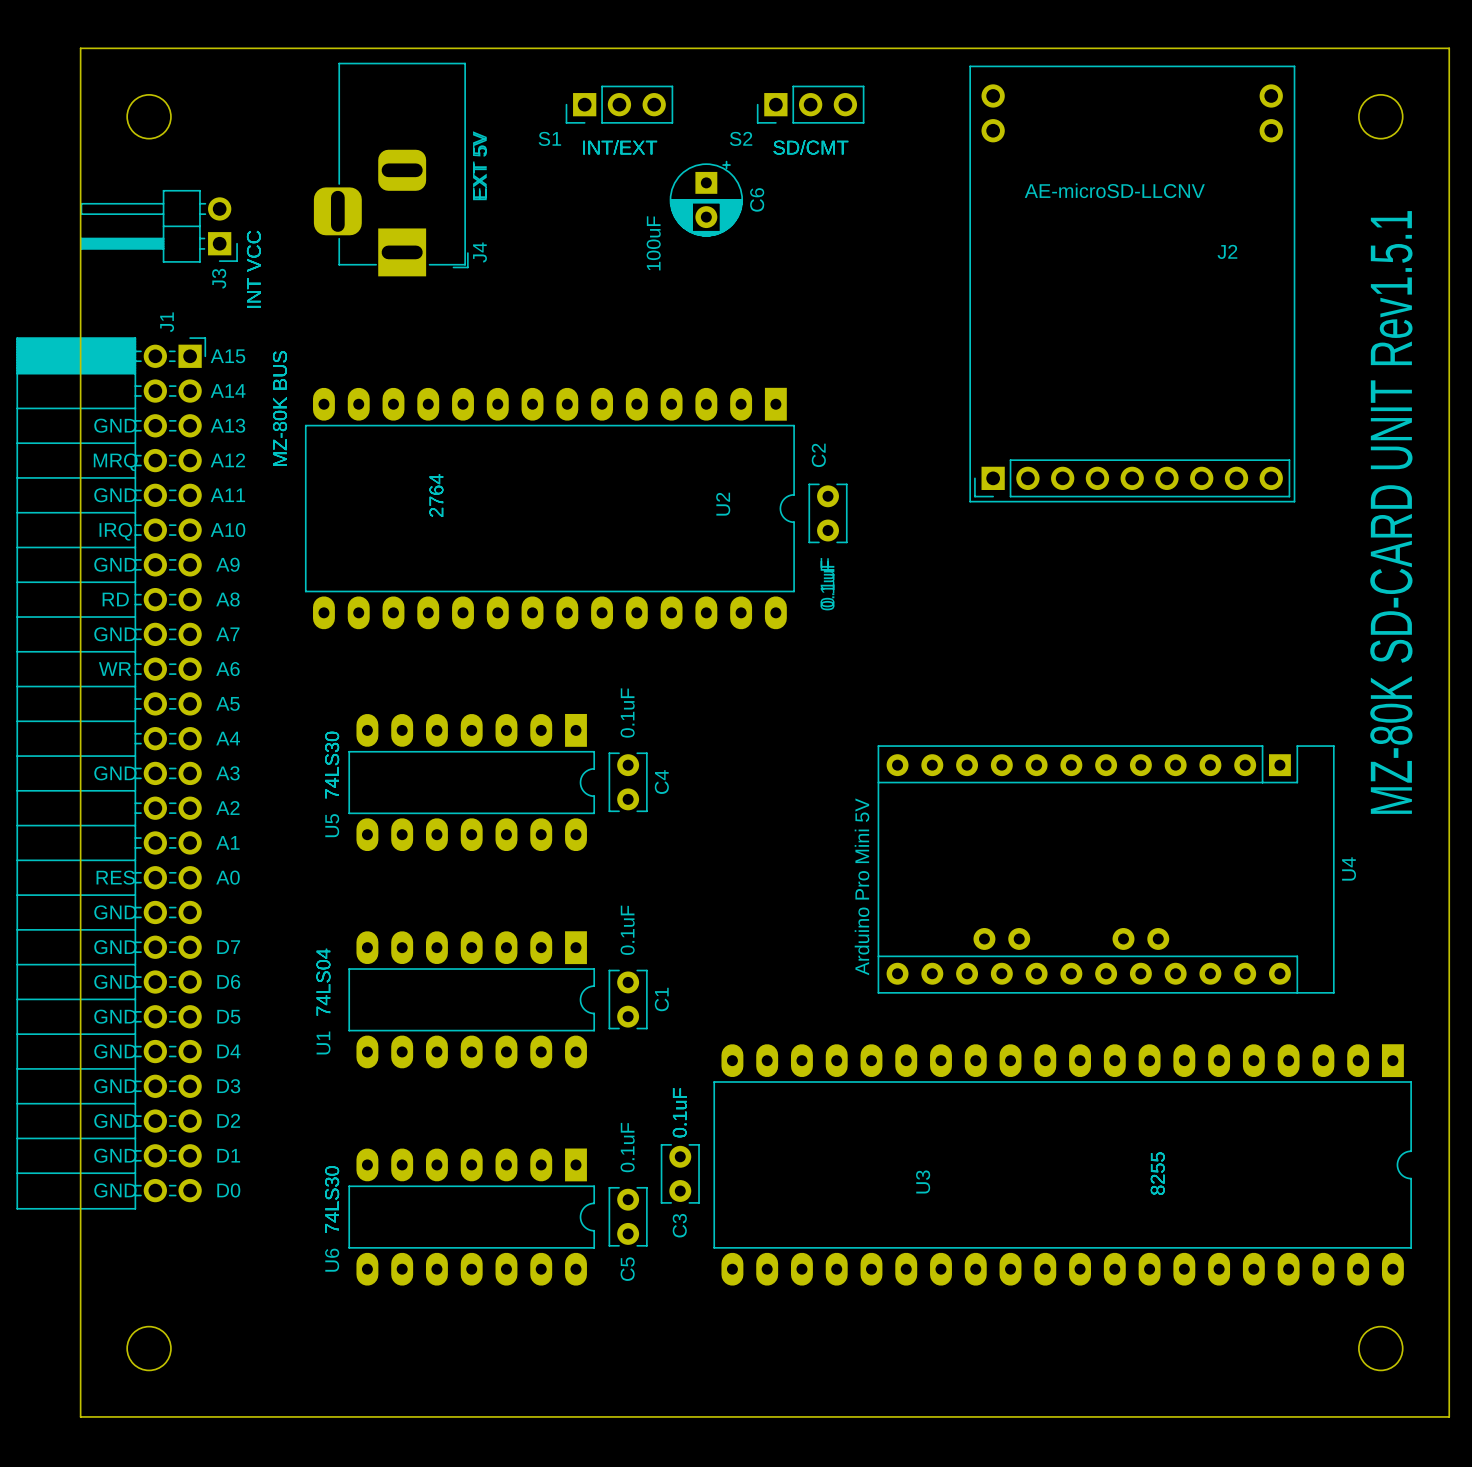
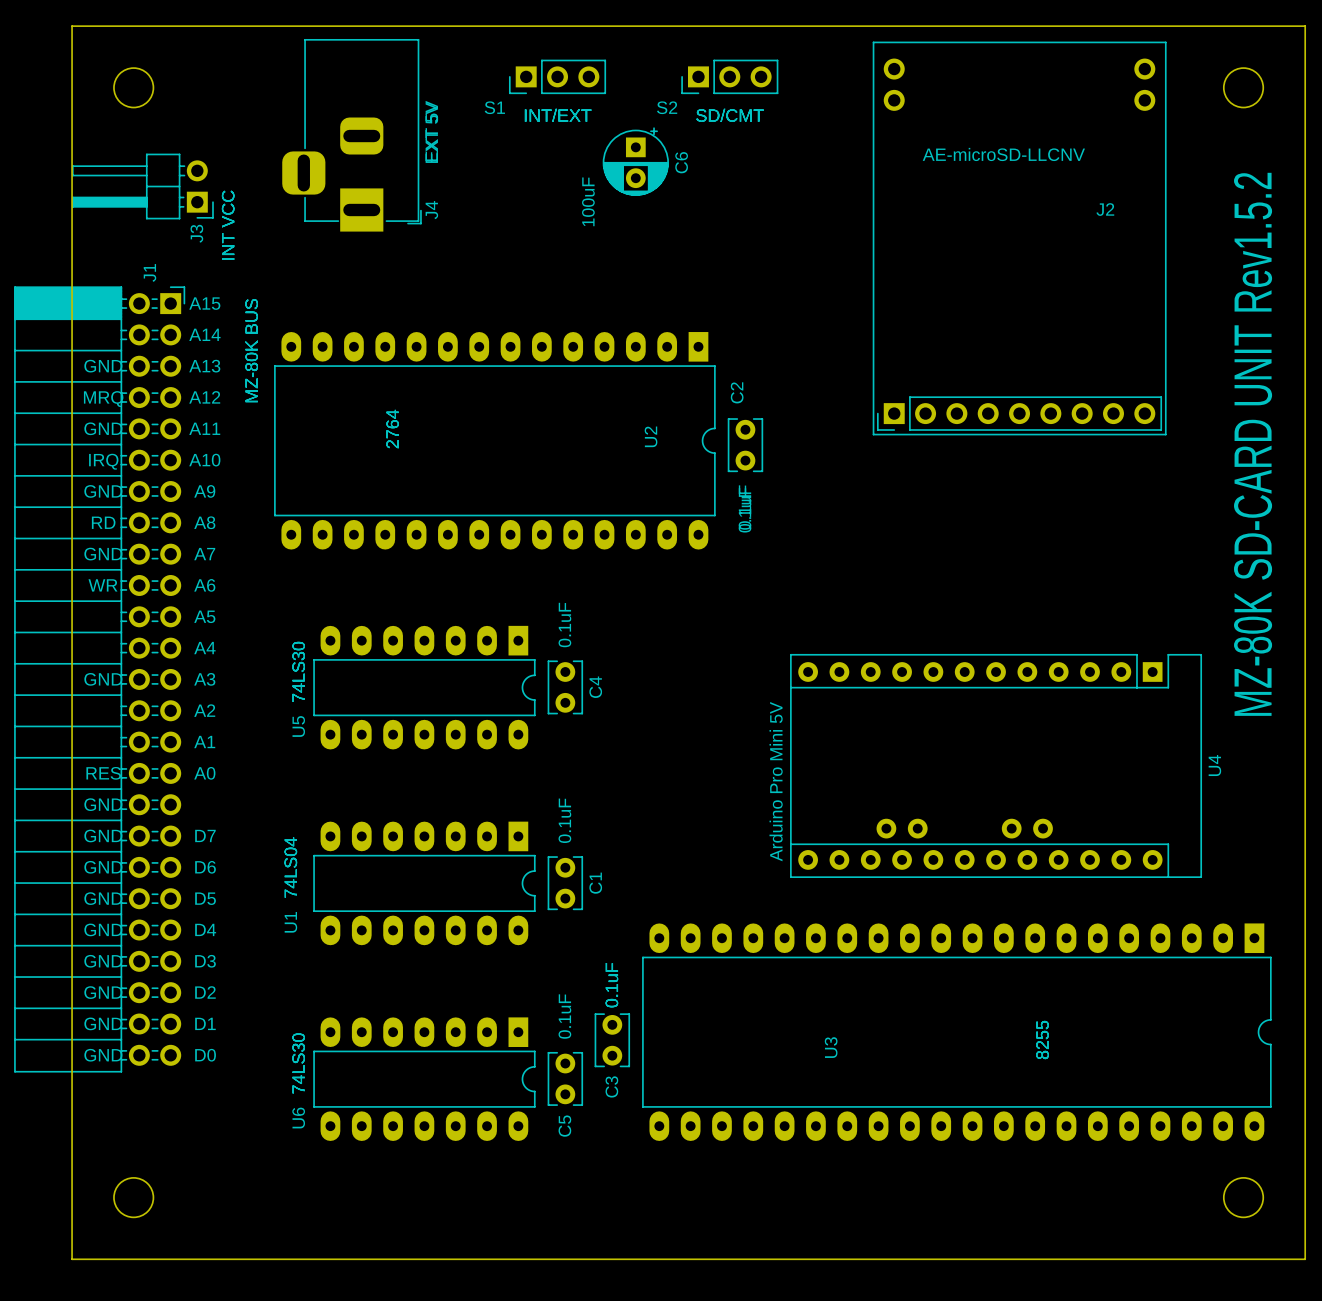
text: MZ-80K SD-CARD UNIT Rev1.5.1 (1391, 512) -> MZ-80K SD-CARD UNIT Rev1.5.2 (1253, 444)

